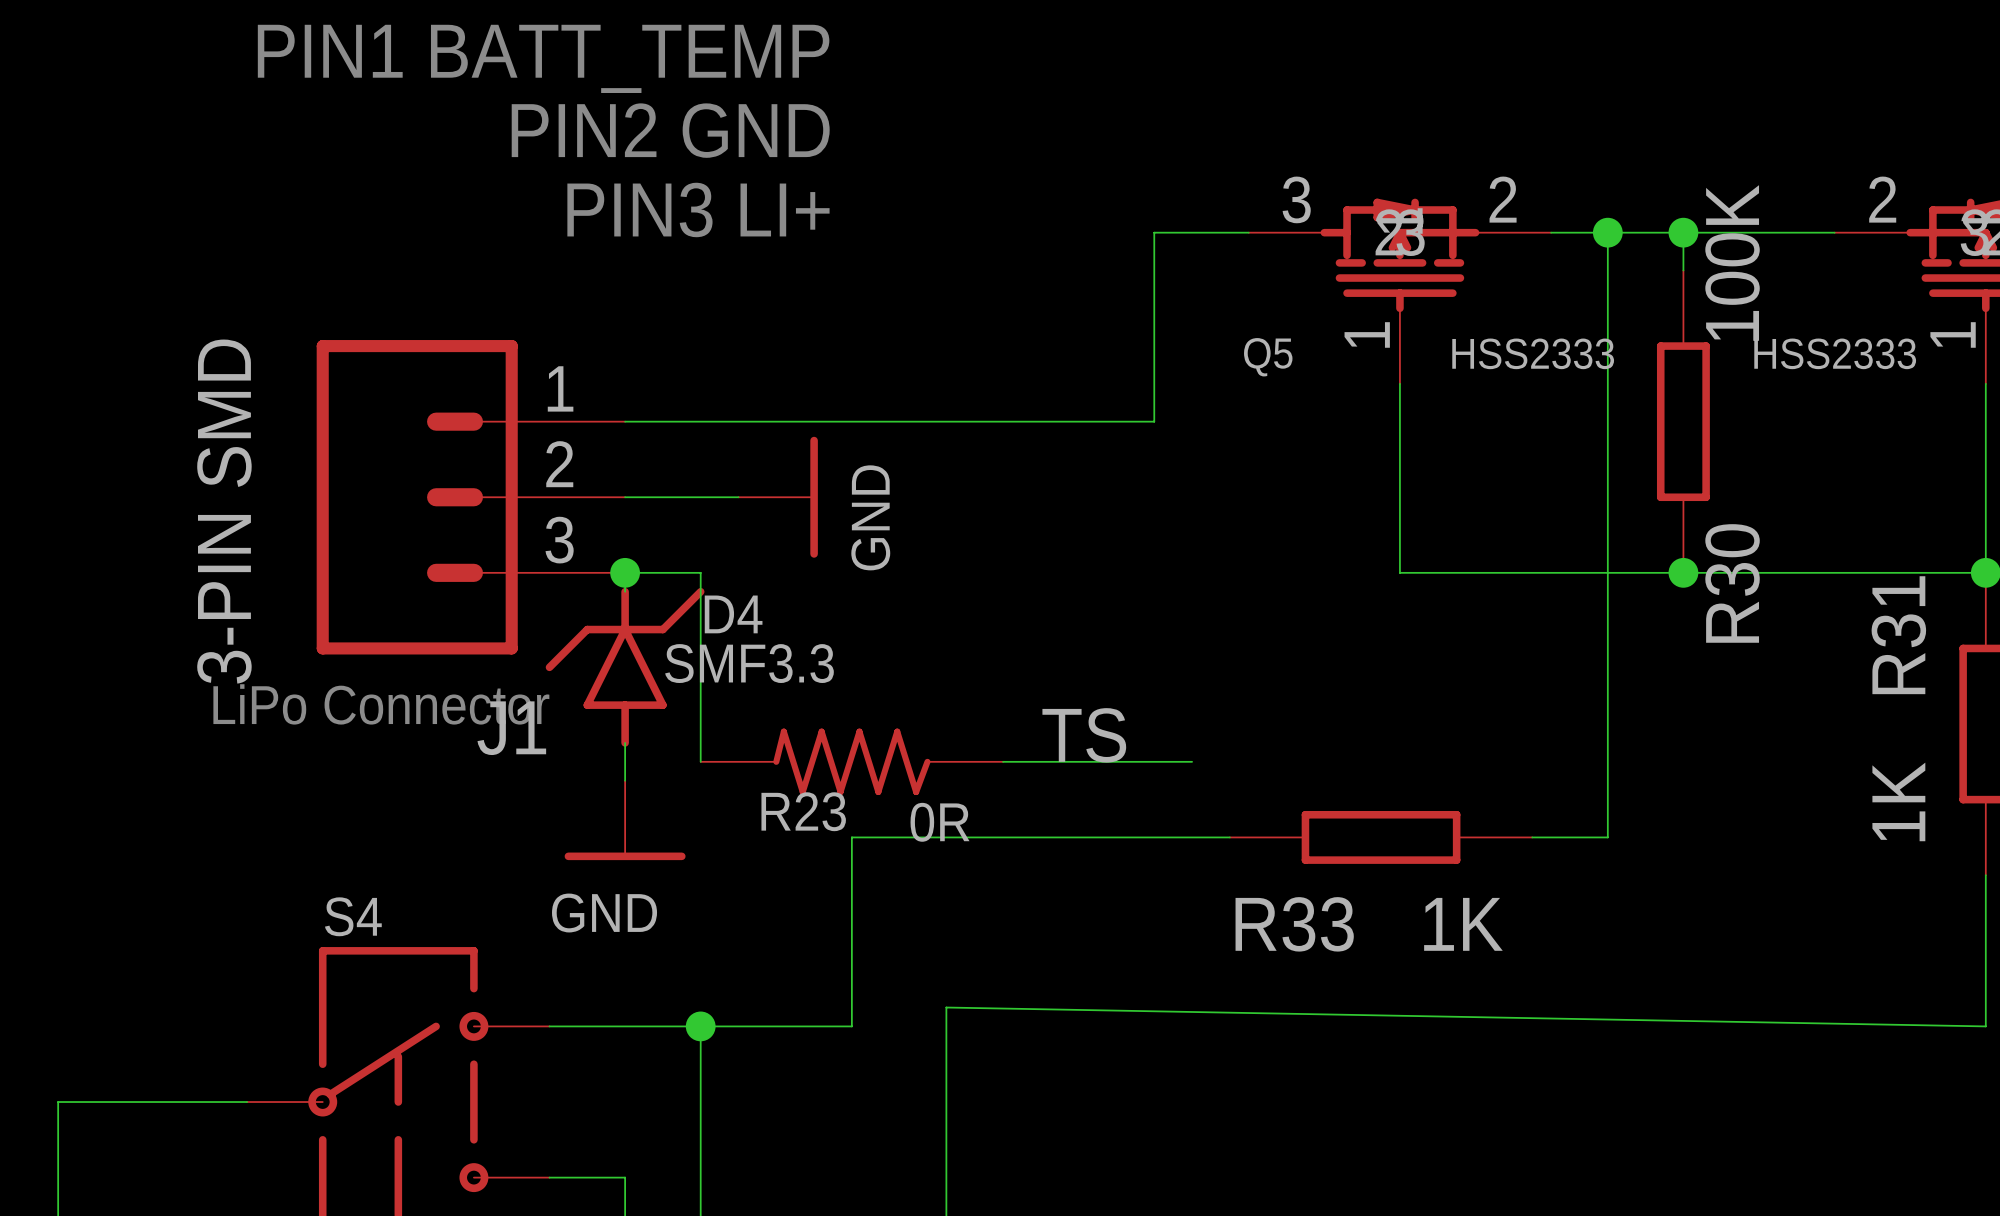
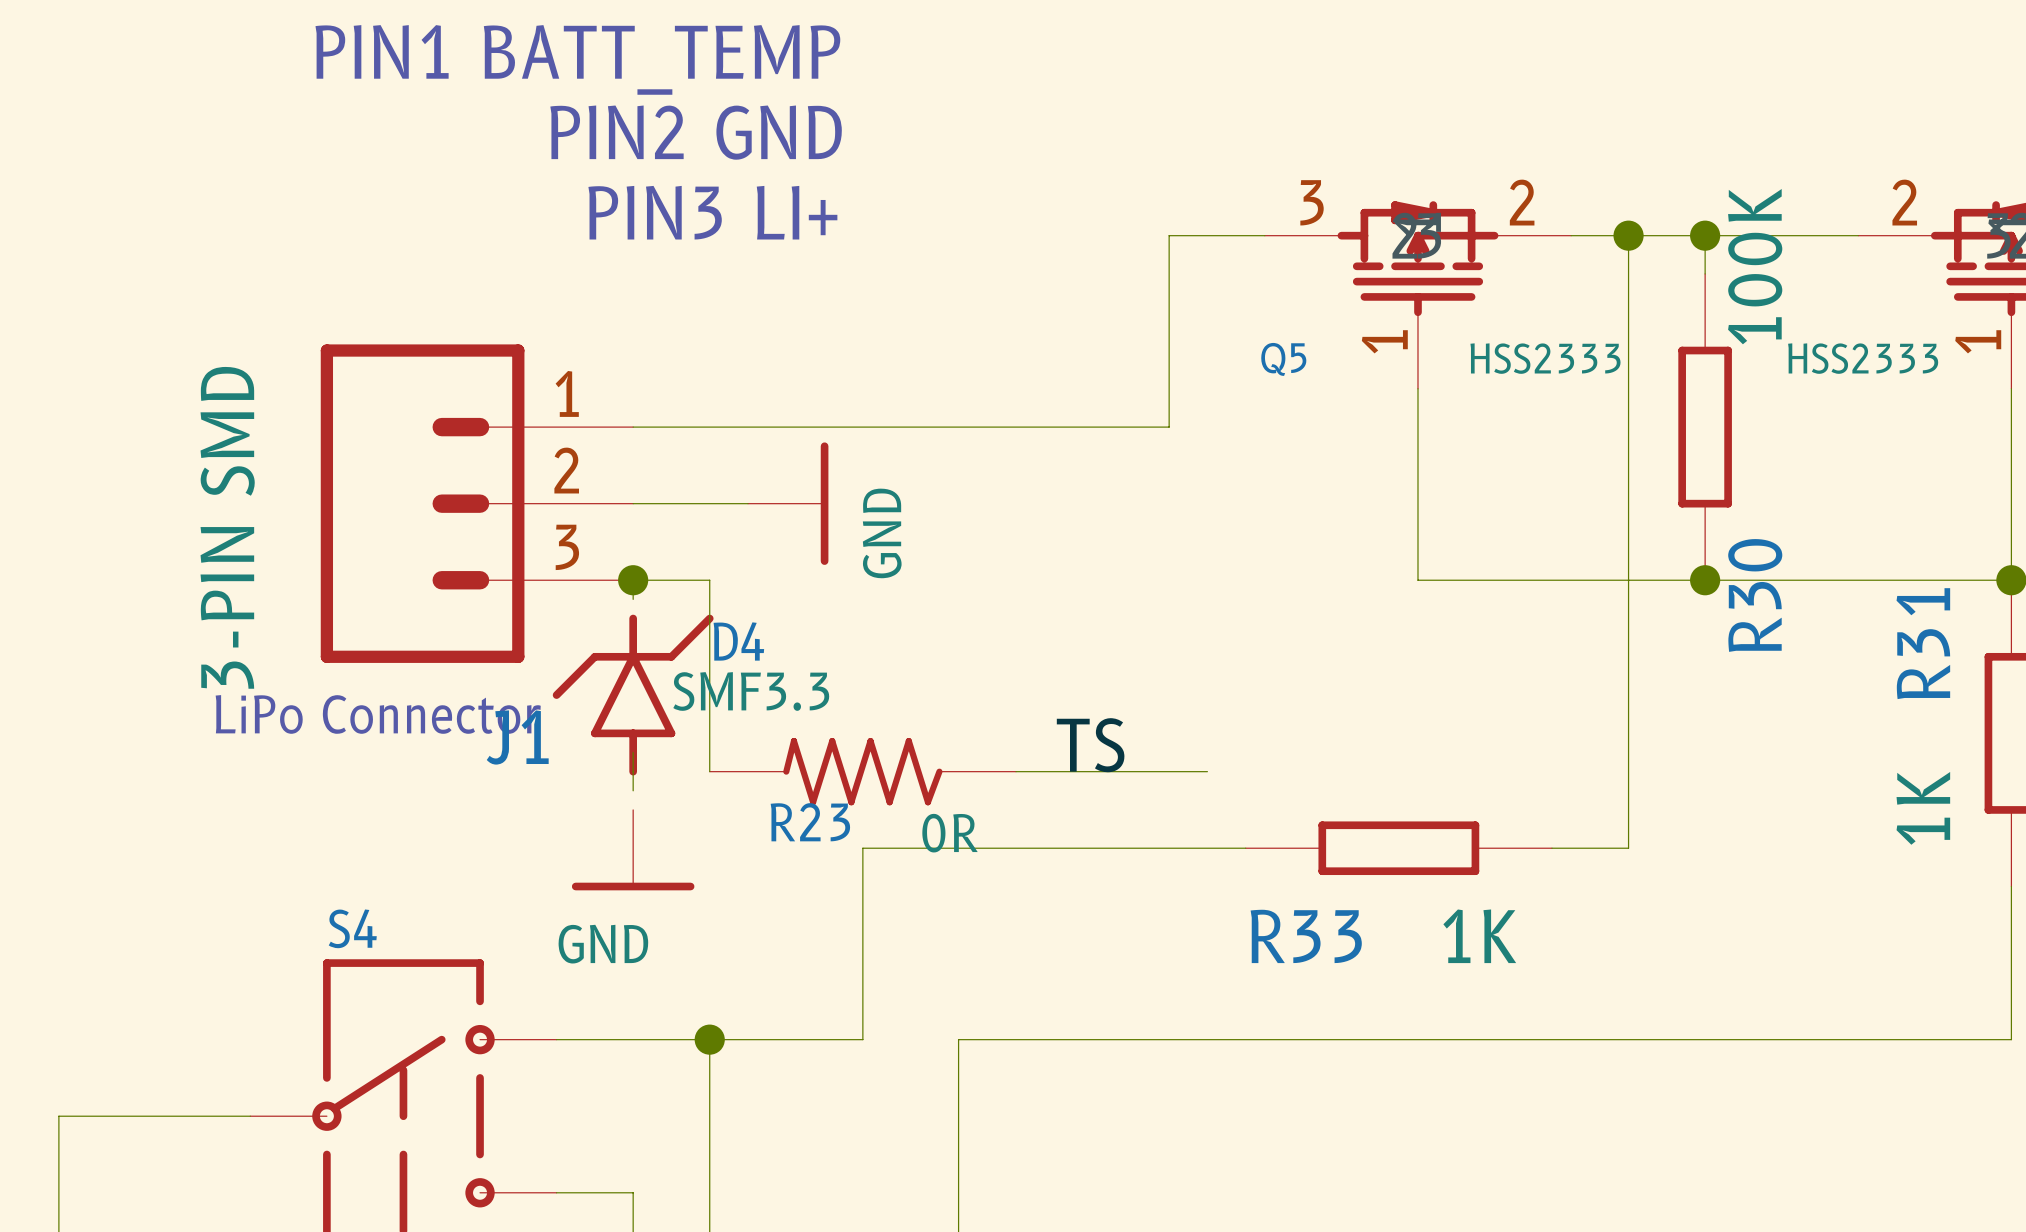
D4 position: (625, 667) -> (633, 695)
power symbol position: GND (625, 820) -> GND (633, 850)
wire: (946, 1026) (946, 1007) (1985, 1026) -> (958, 1039) (2011, 1039)

